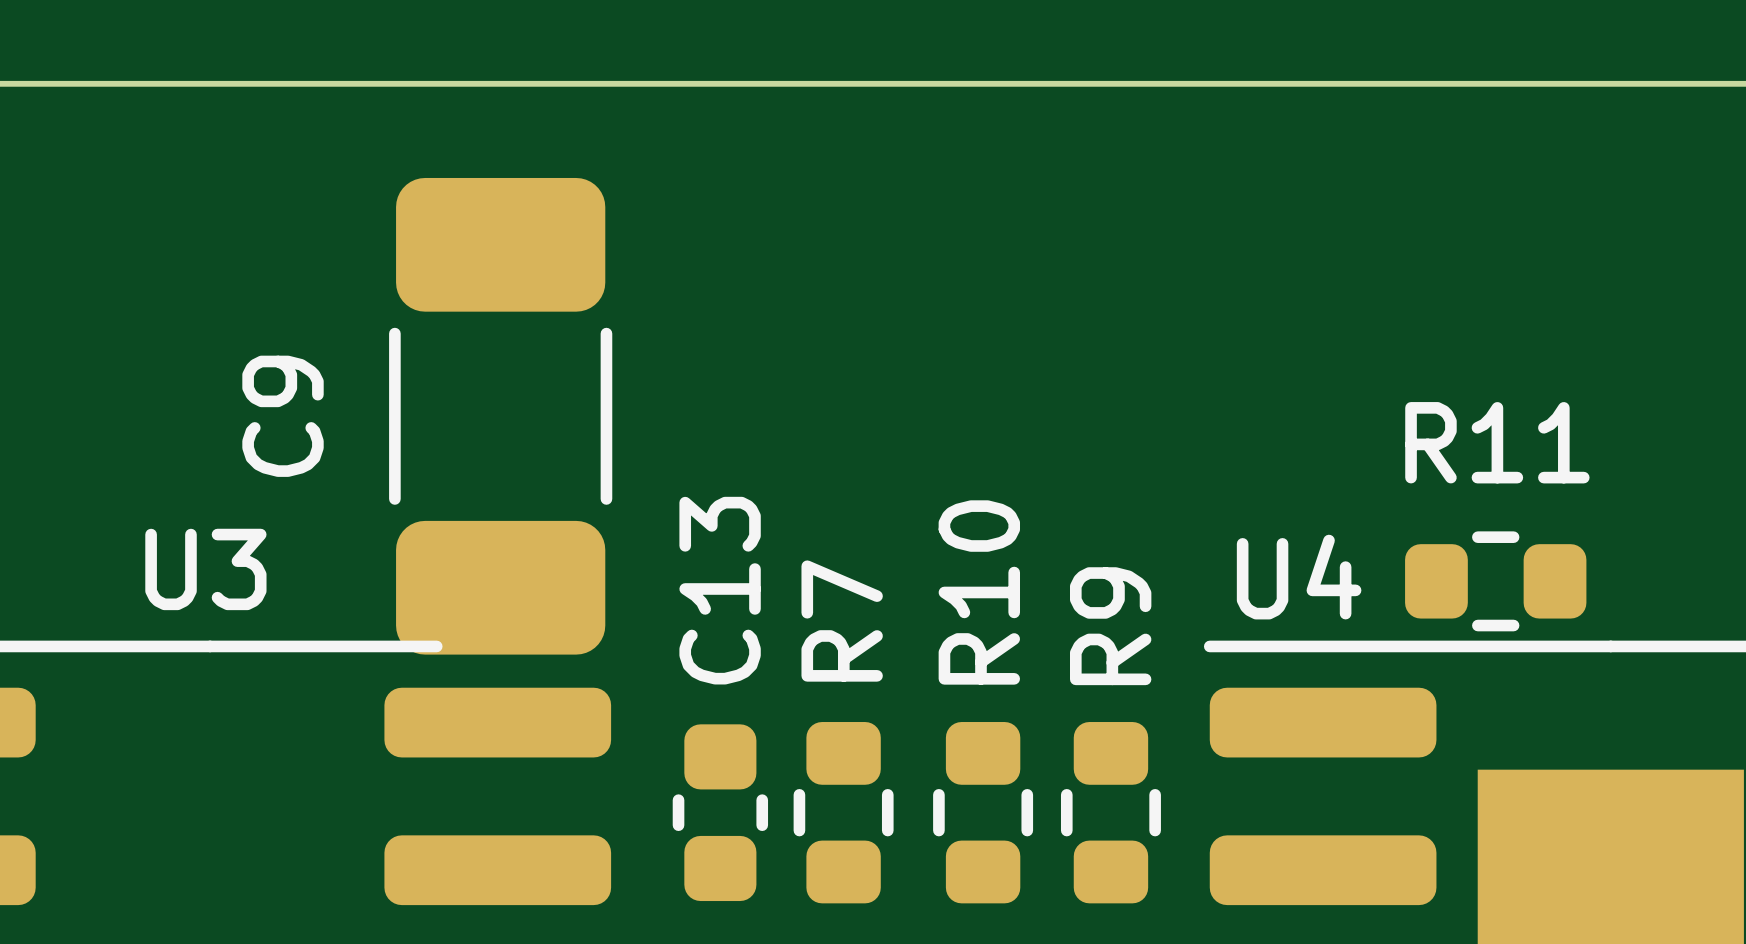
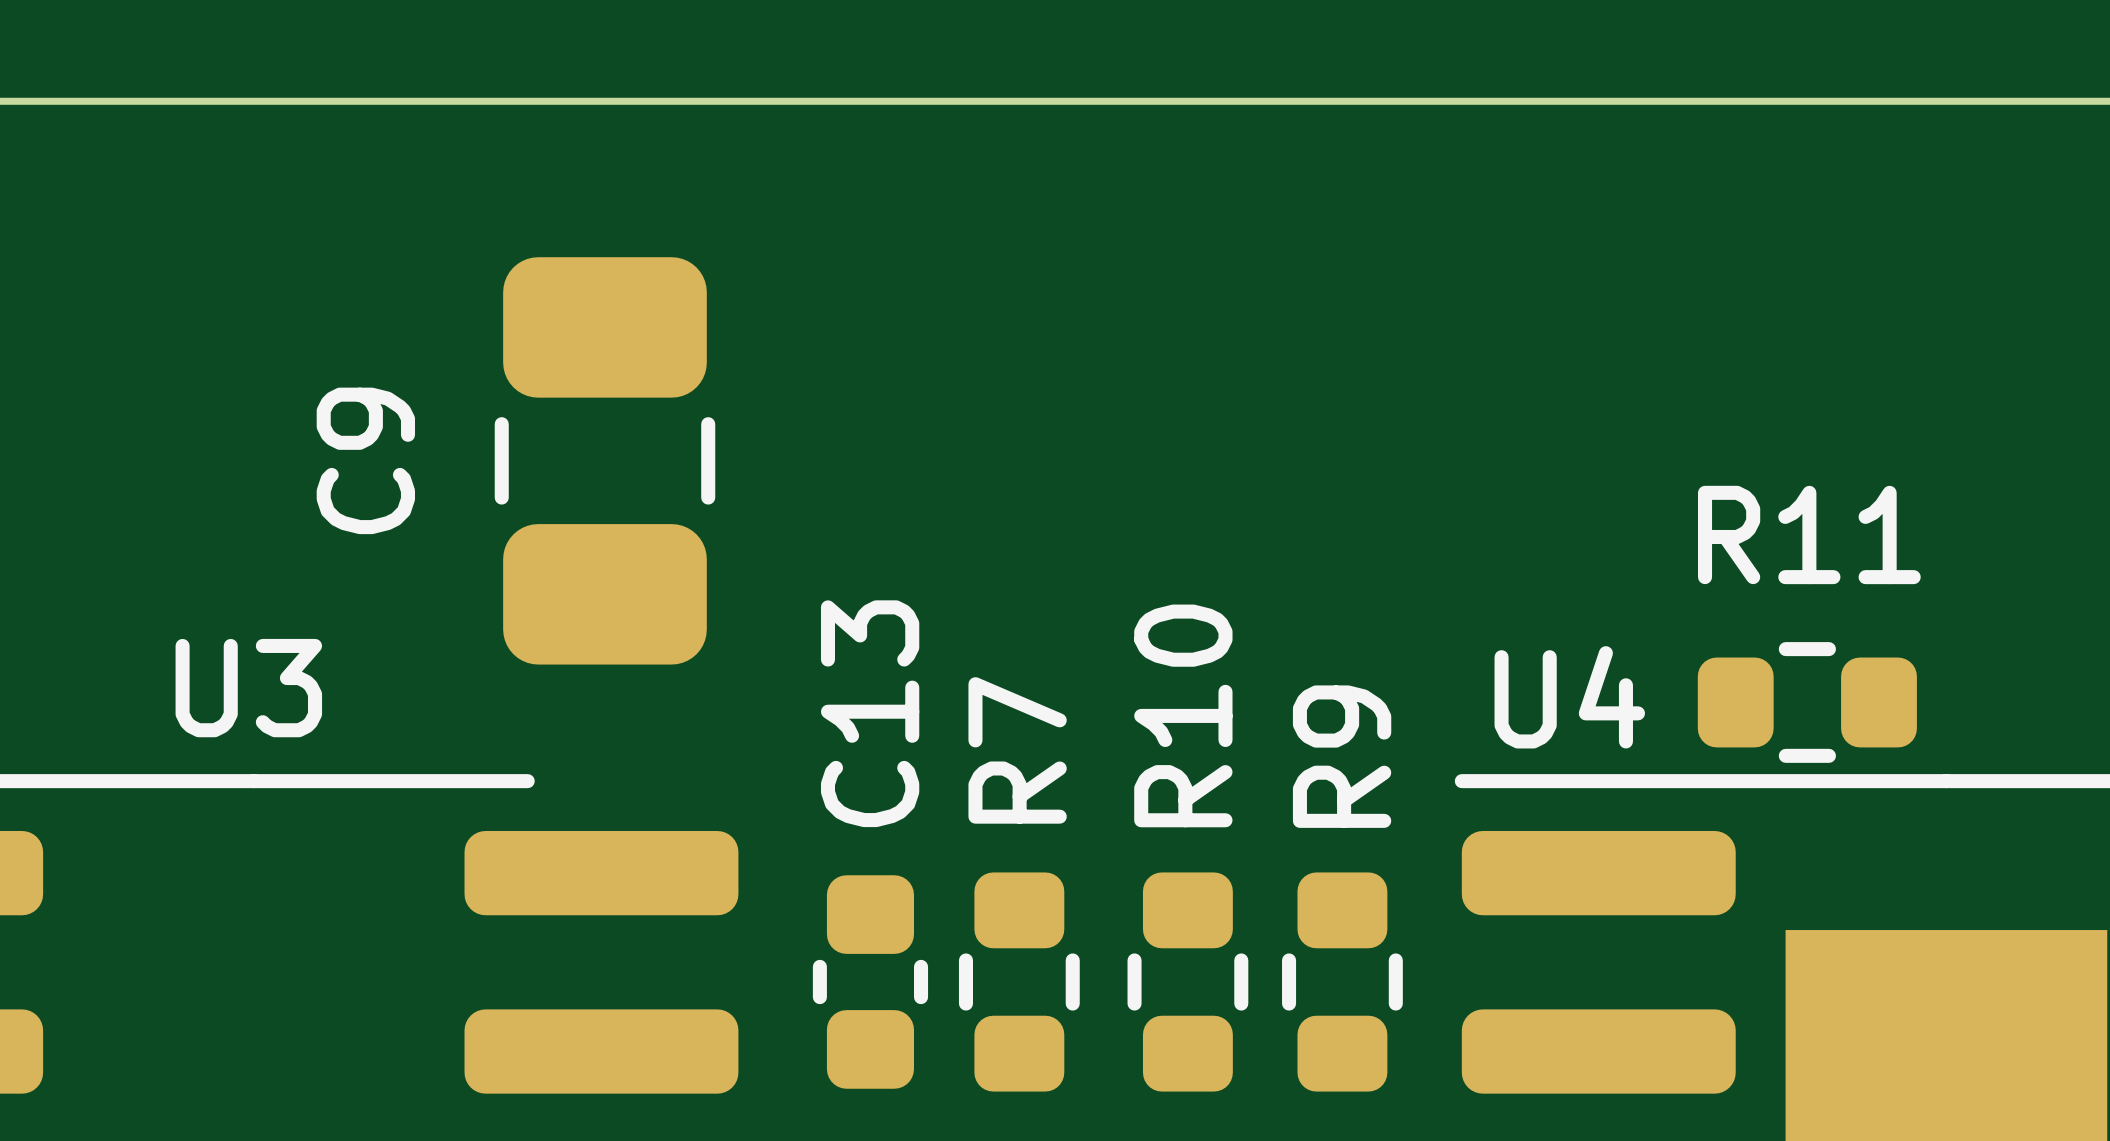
C9 footprint: [389, 177, 613, 655] -> [494, 257, 716, 665]
C9 name position: C9 (283, 416) -> C9 (365, 460)

